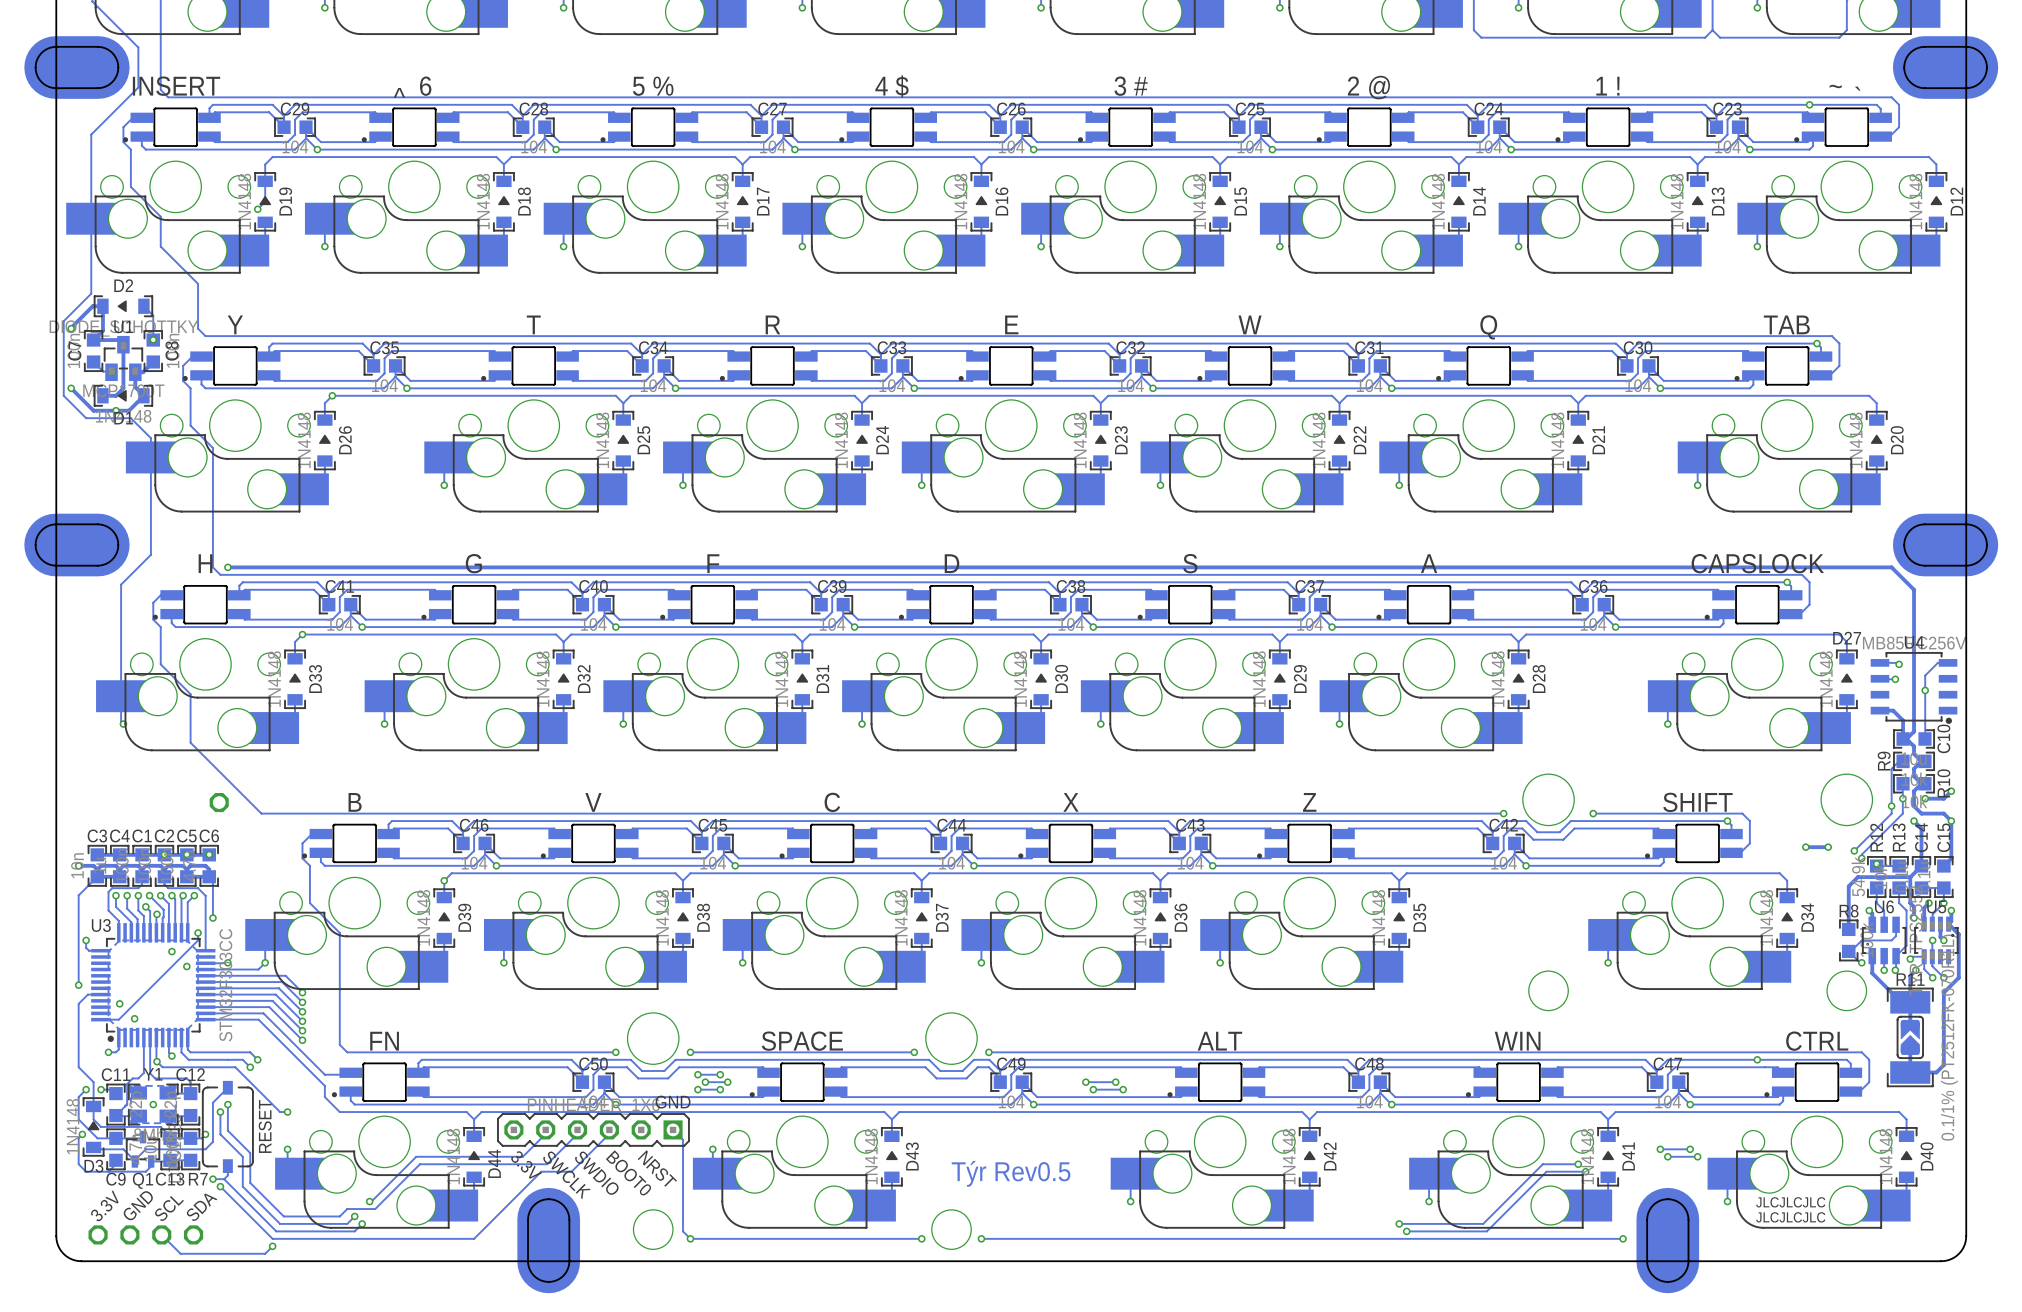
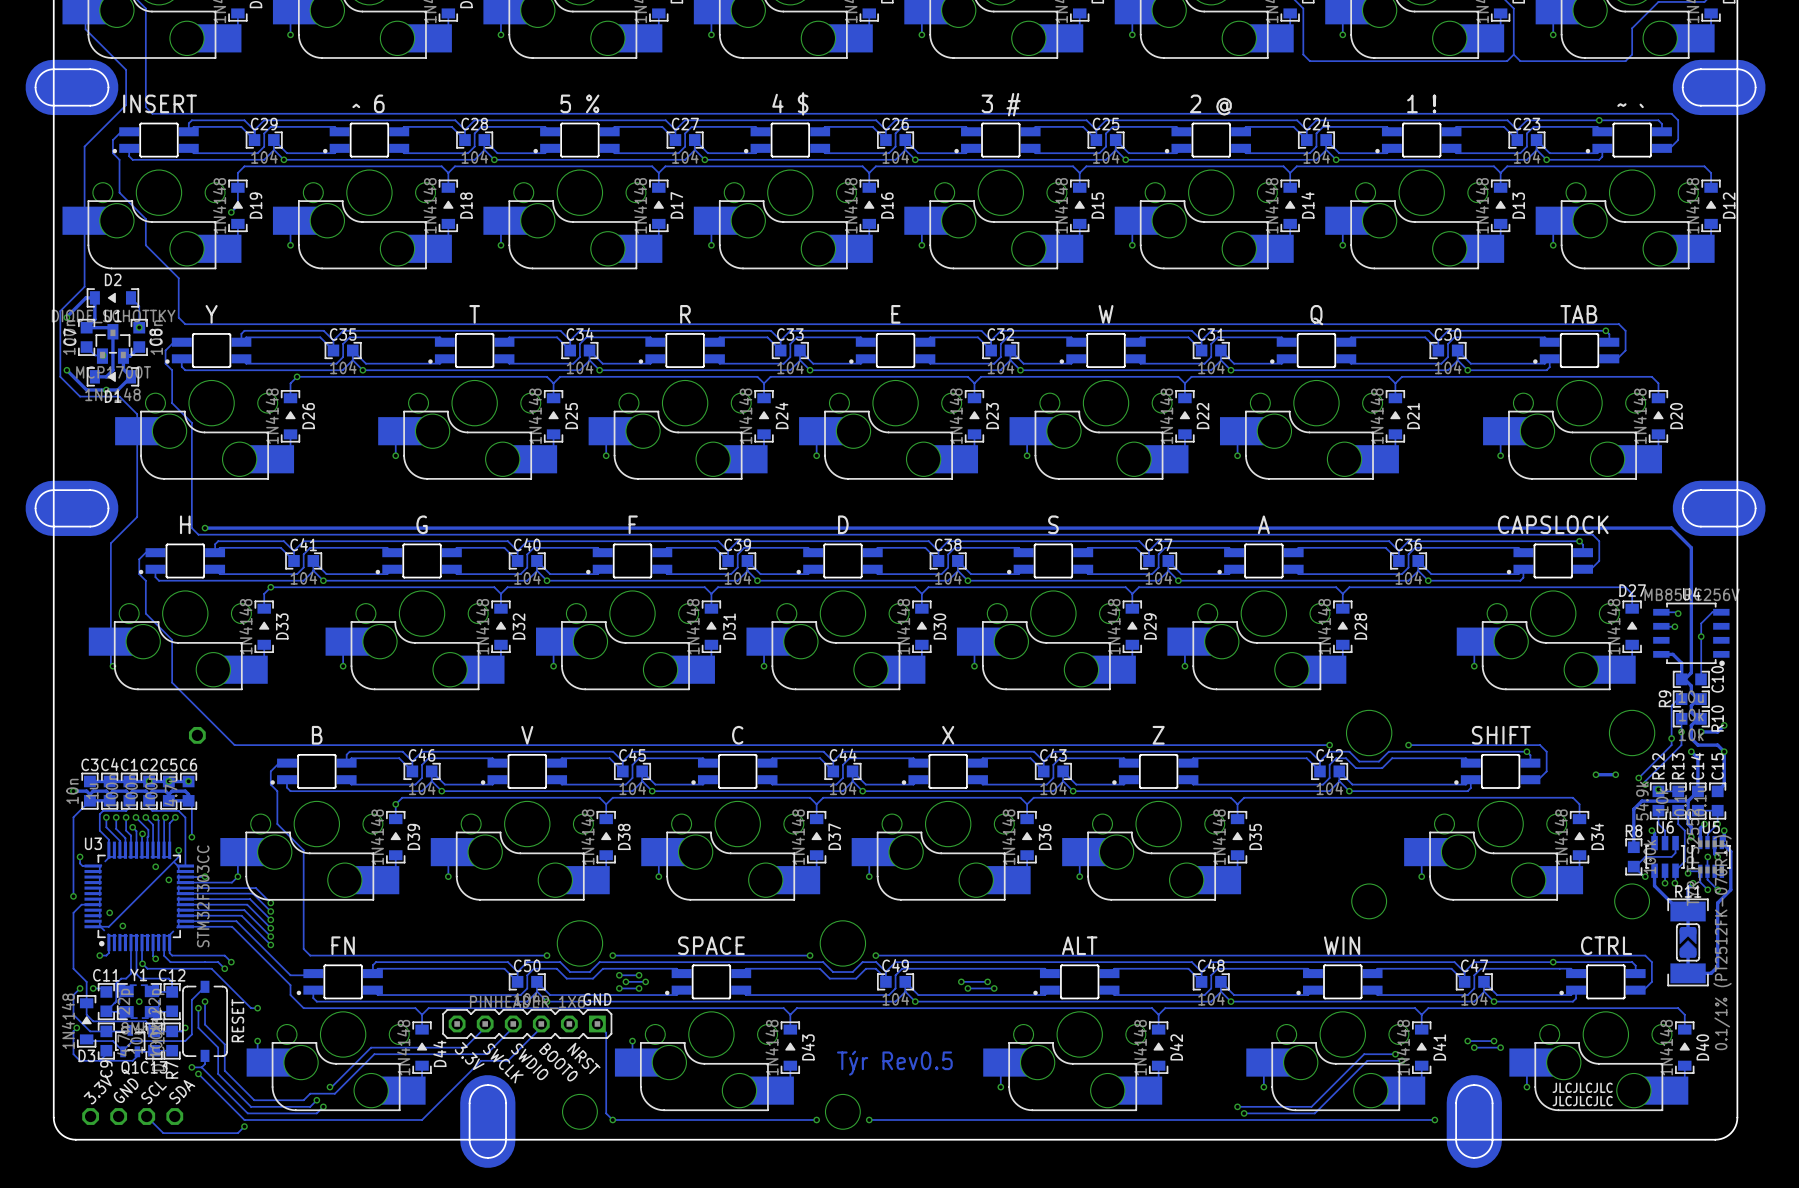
C9 name rotation: 0° (116, 1179) -> 90° counterclockwise (106, 1069)
R7 name rotation: 0° (198, 1179) -> 90° counterclockwise (172, 1070)

